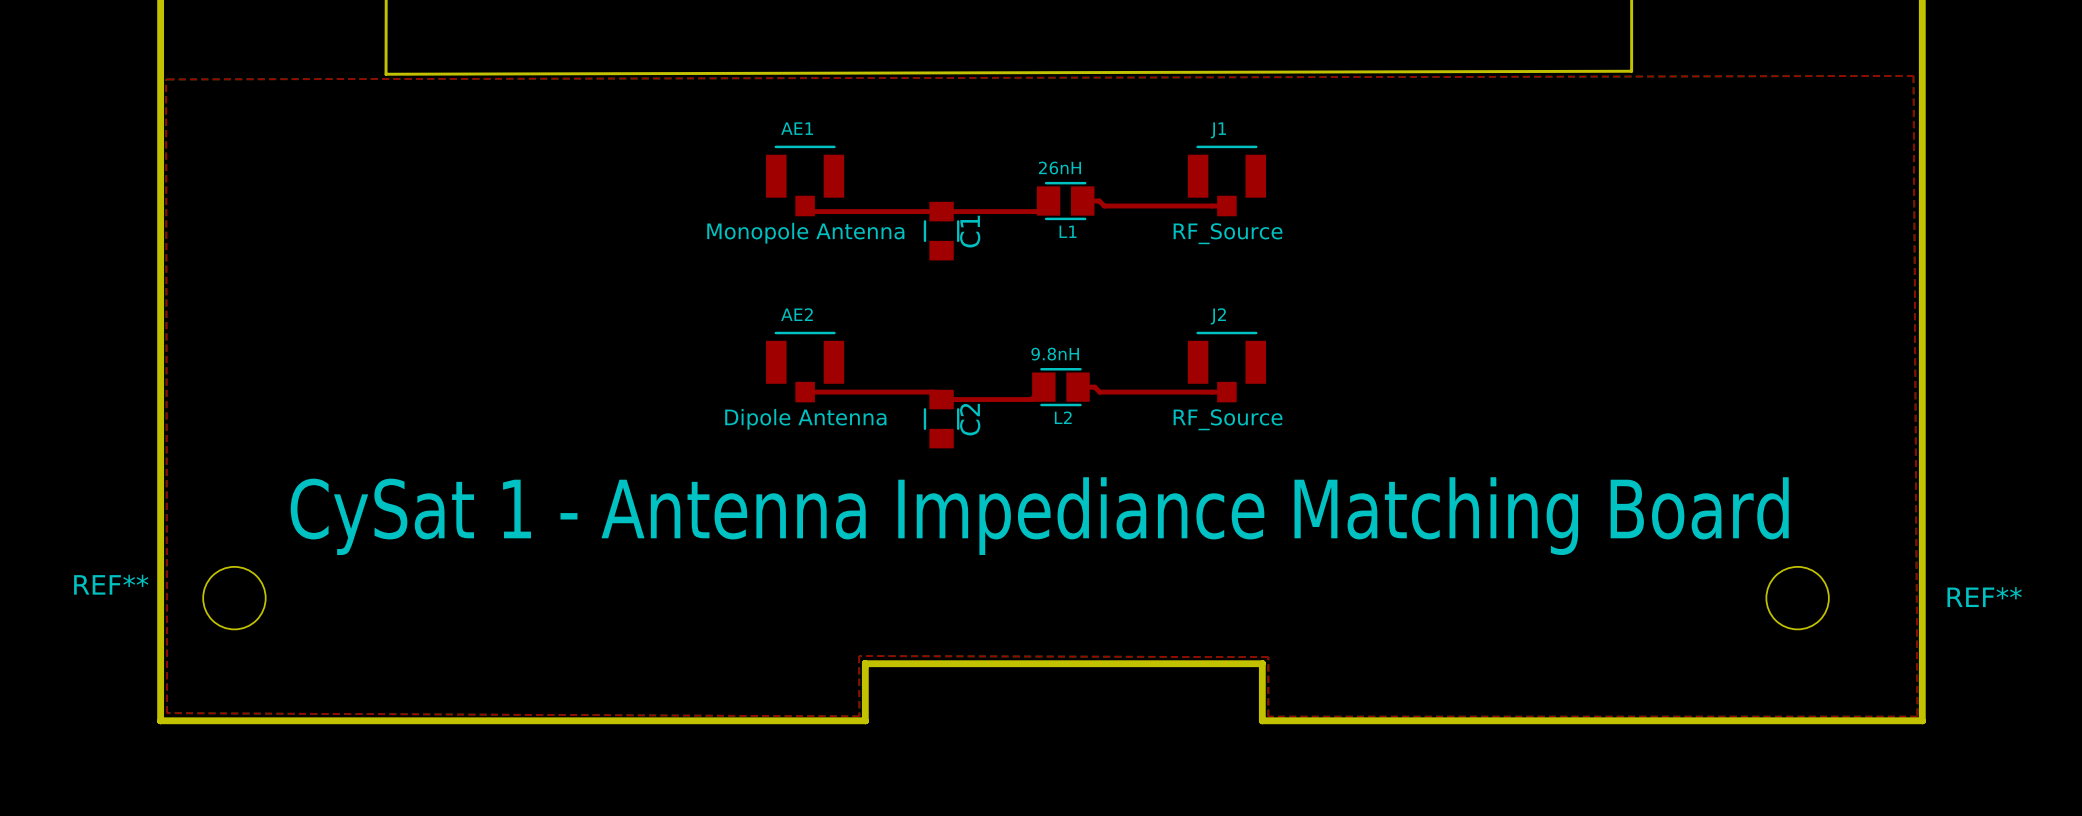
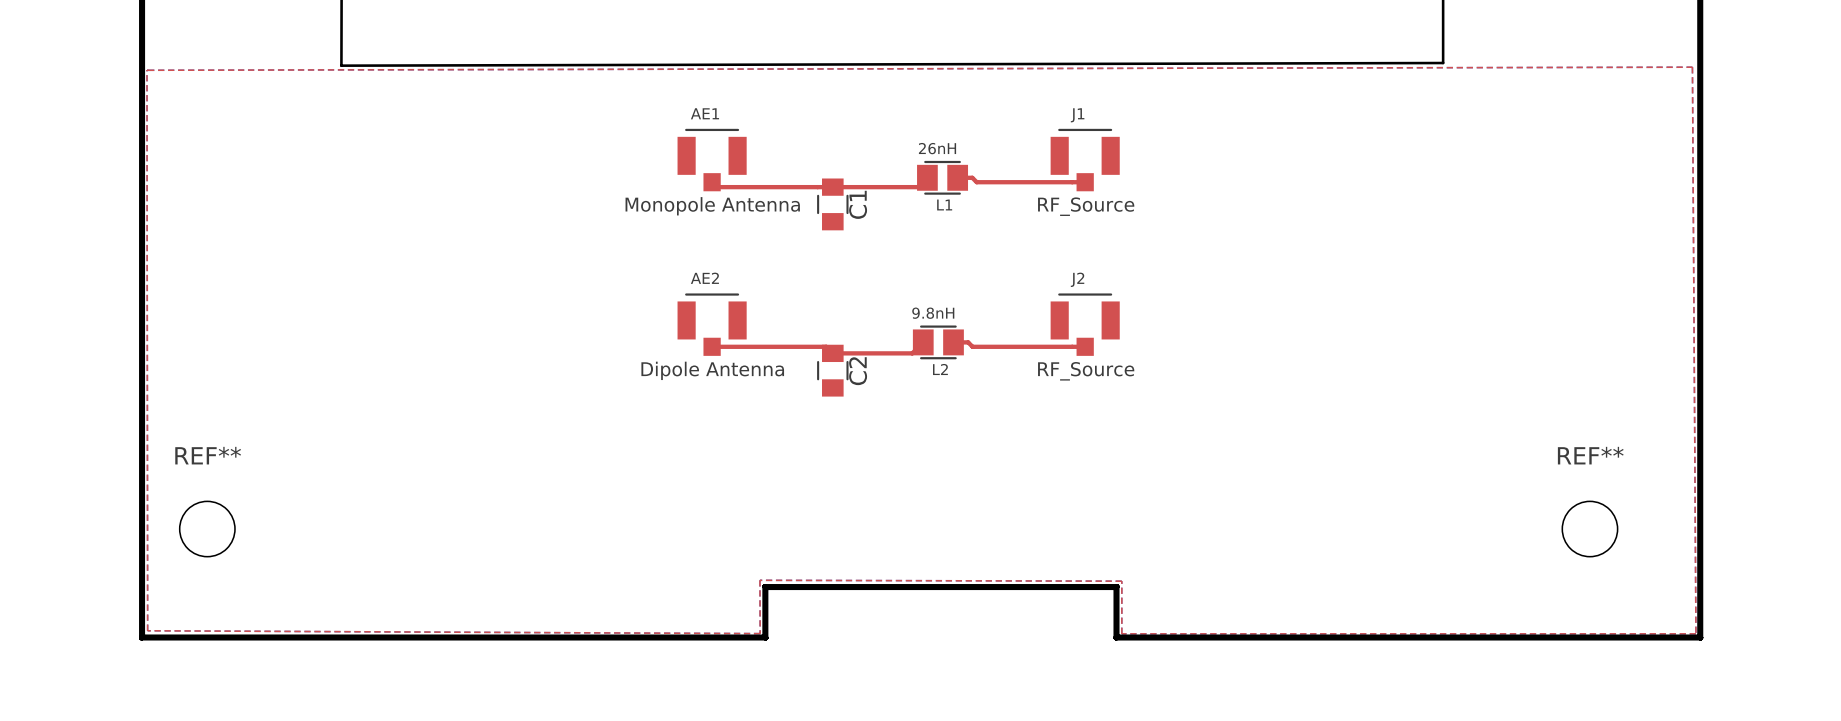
text: CySat 1 - Antenna Impediance Matching Board (1039, 516) -> none
REF** name position: REF** (111, 584) -> REF** (208, 455)
REF** name position: REF** (1984, 597) -> REF** (1590, 455)

